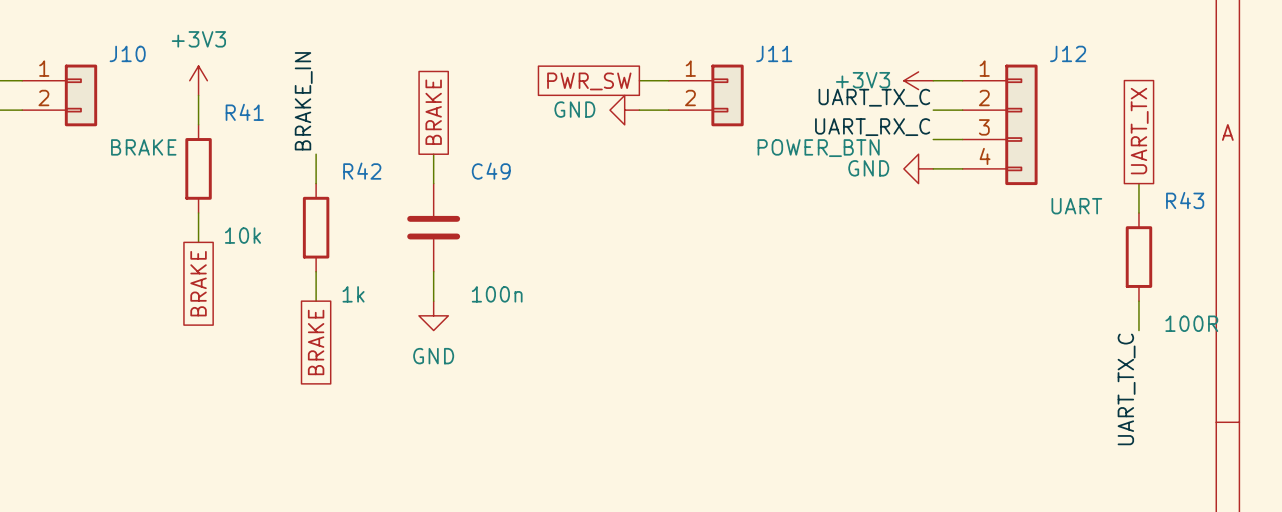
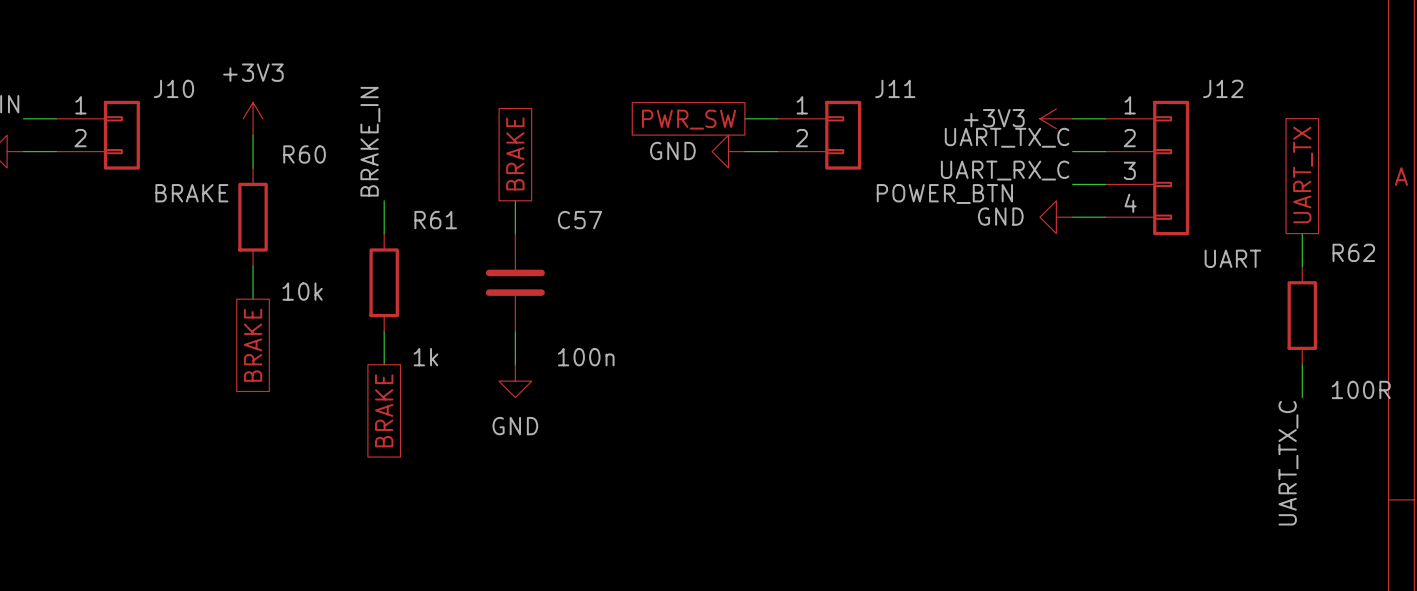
R41 name: R41 (244, 112) -> R60 (304, 154)
R42 name: R42 (362, 171) -> R61 (435, 220)
C49 name: C49 (491, 171) -> C57 (579, 220)
R43 name: R43 (1185, 200) -> R62 (1353, 252)

